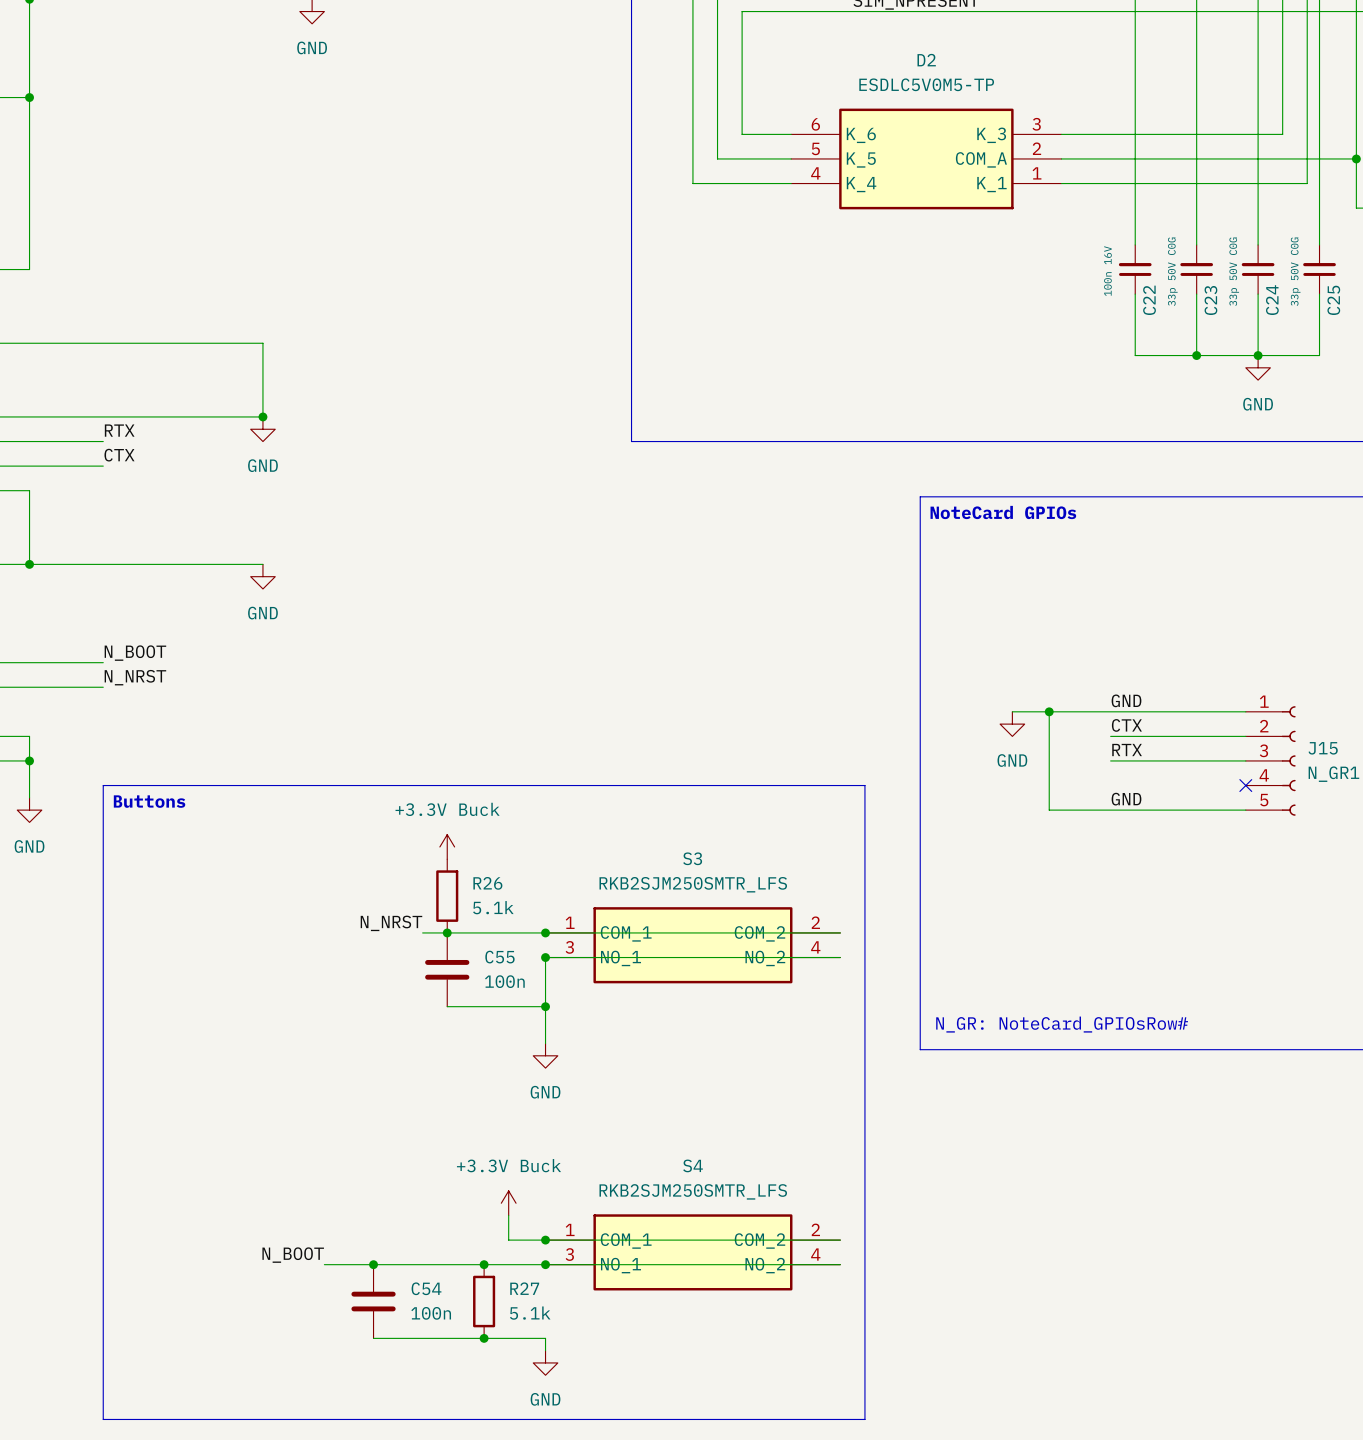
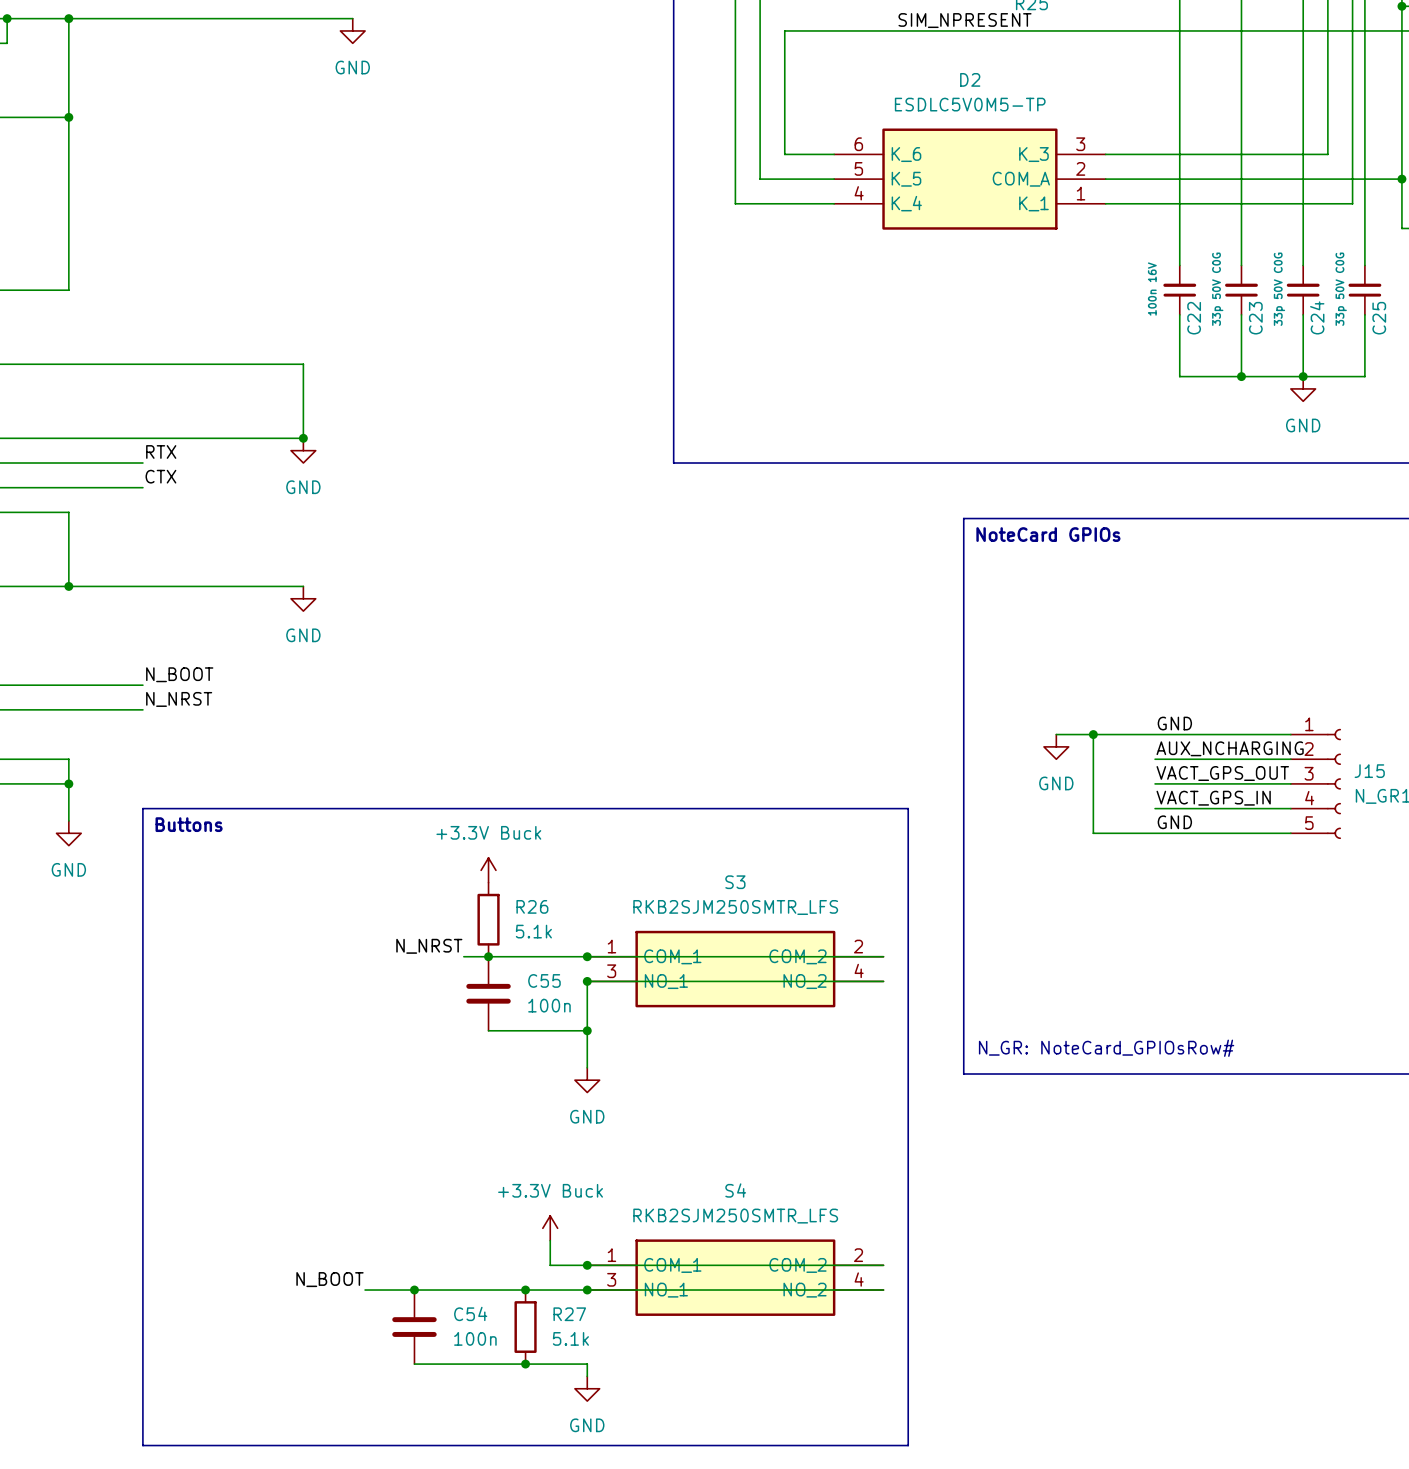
label: CTX (1126, 725) -> AUX_NCHARGING (1230, 748)
label: RTX (1127, 750) -> VACT_GPS_OUT (1222, 773)
label: none -> VACT_GPS_IN (1213, 798)
wire: none -> (1155, 808) (1290, 808)
no-connect mark: (1245, 785) -> none

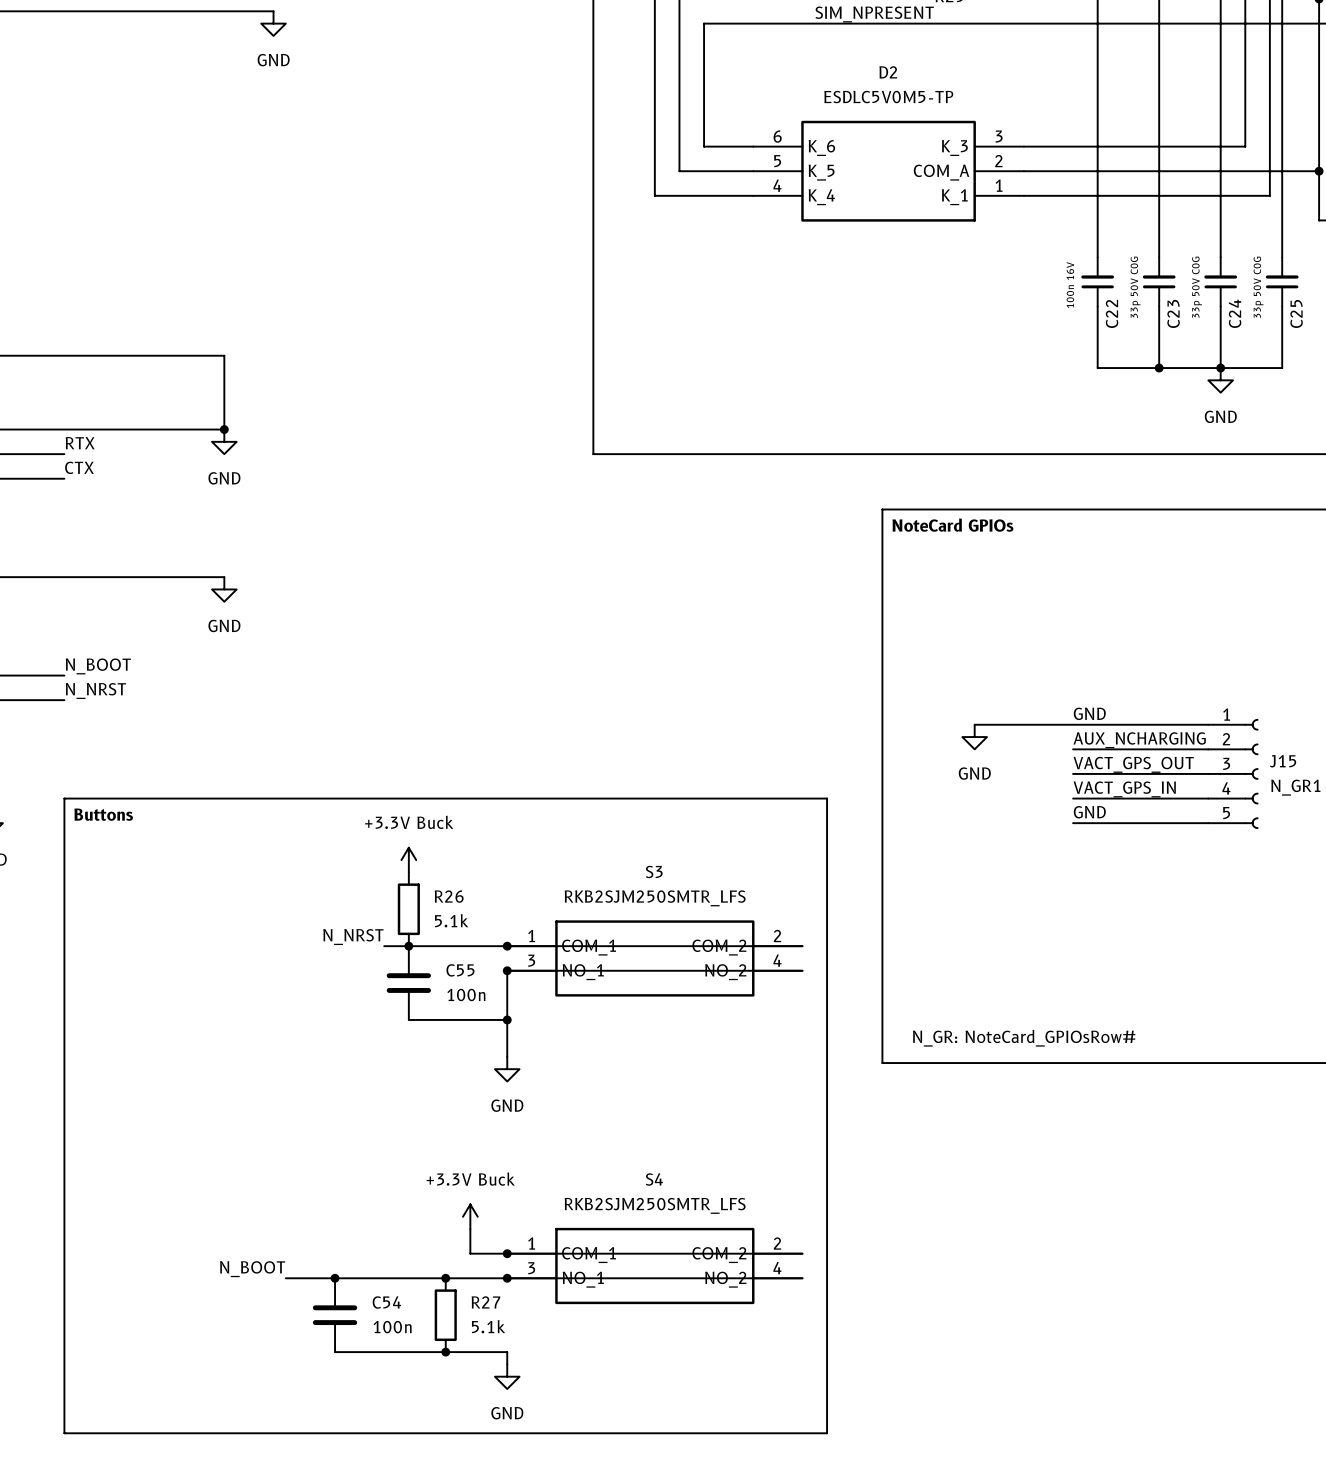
wire: (1093, 734) (1093, 833) (1155, 833) -> none
junction: (1093, 734) -> none

